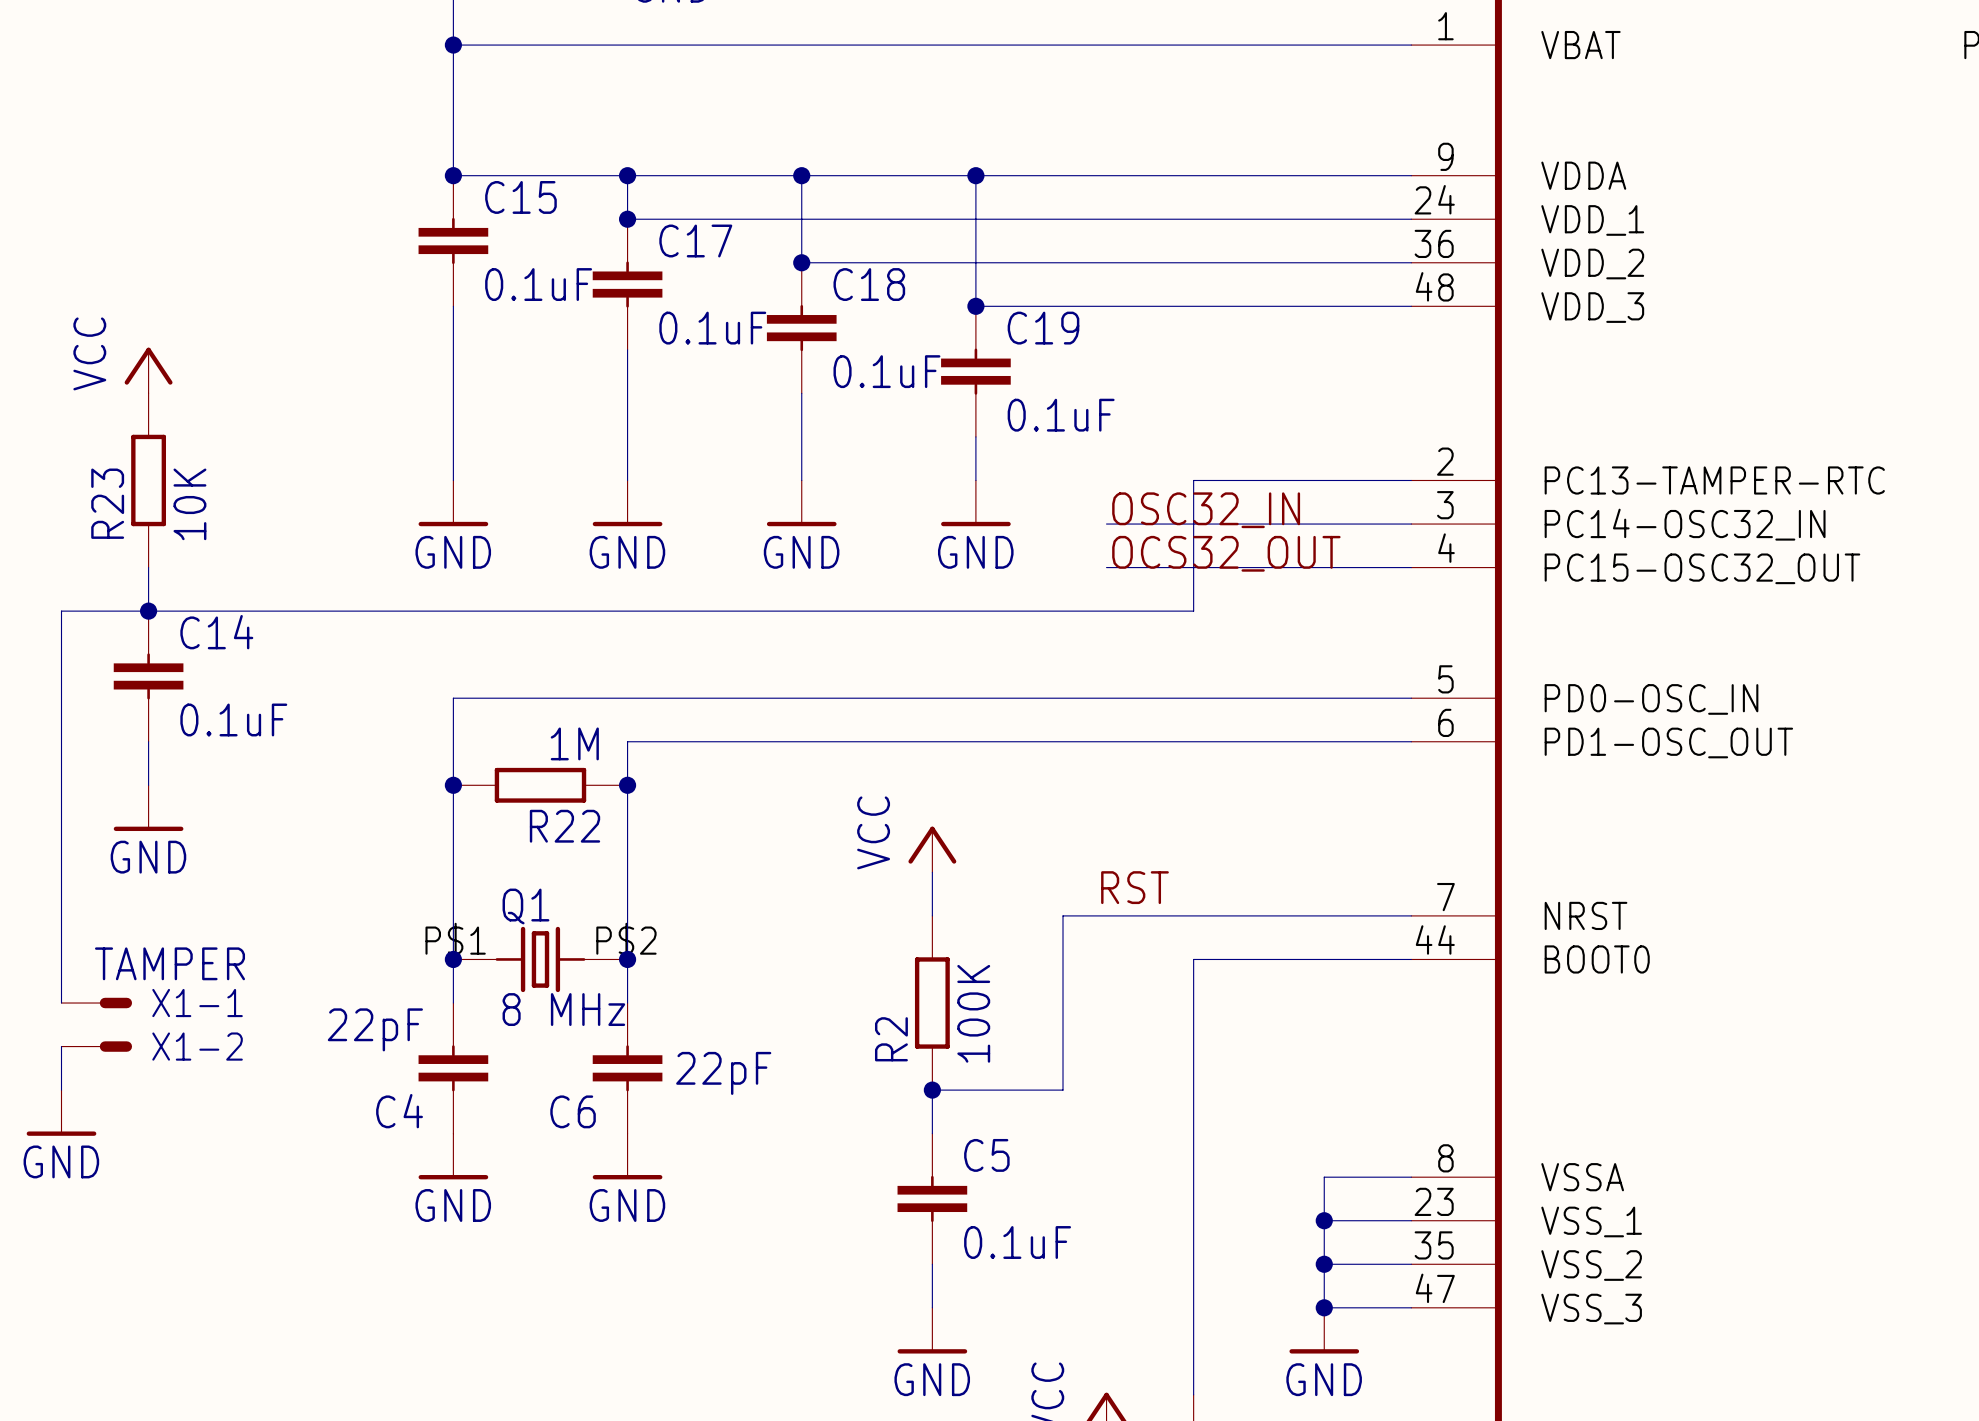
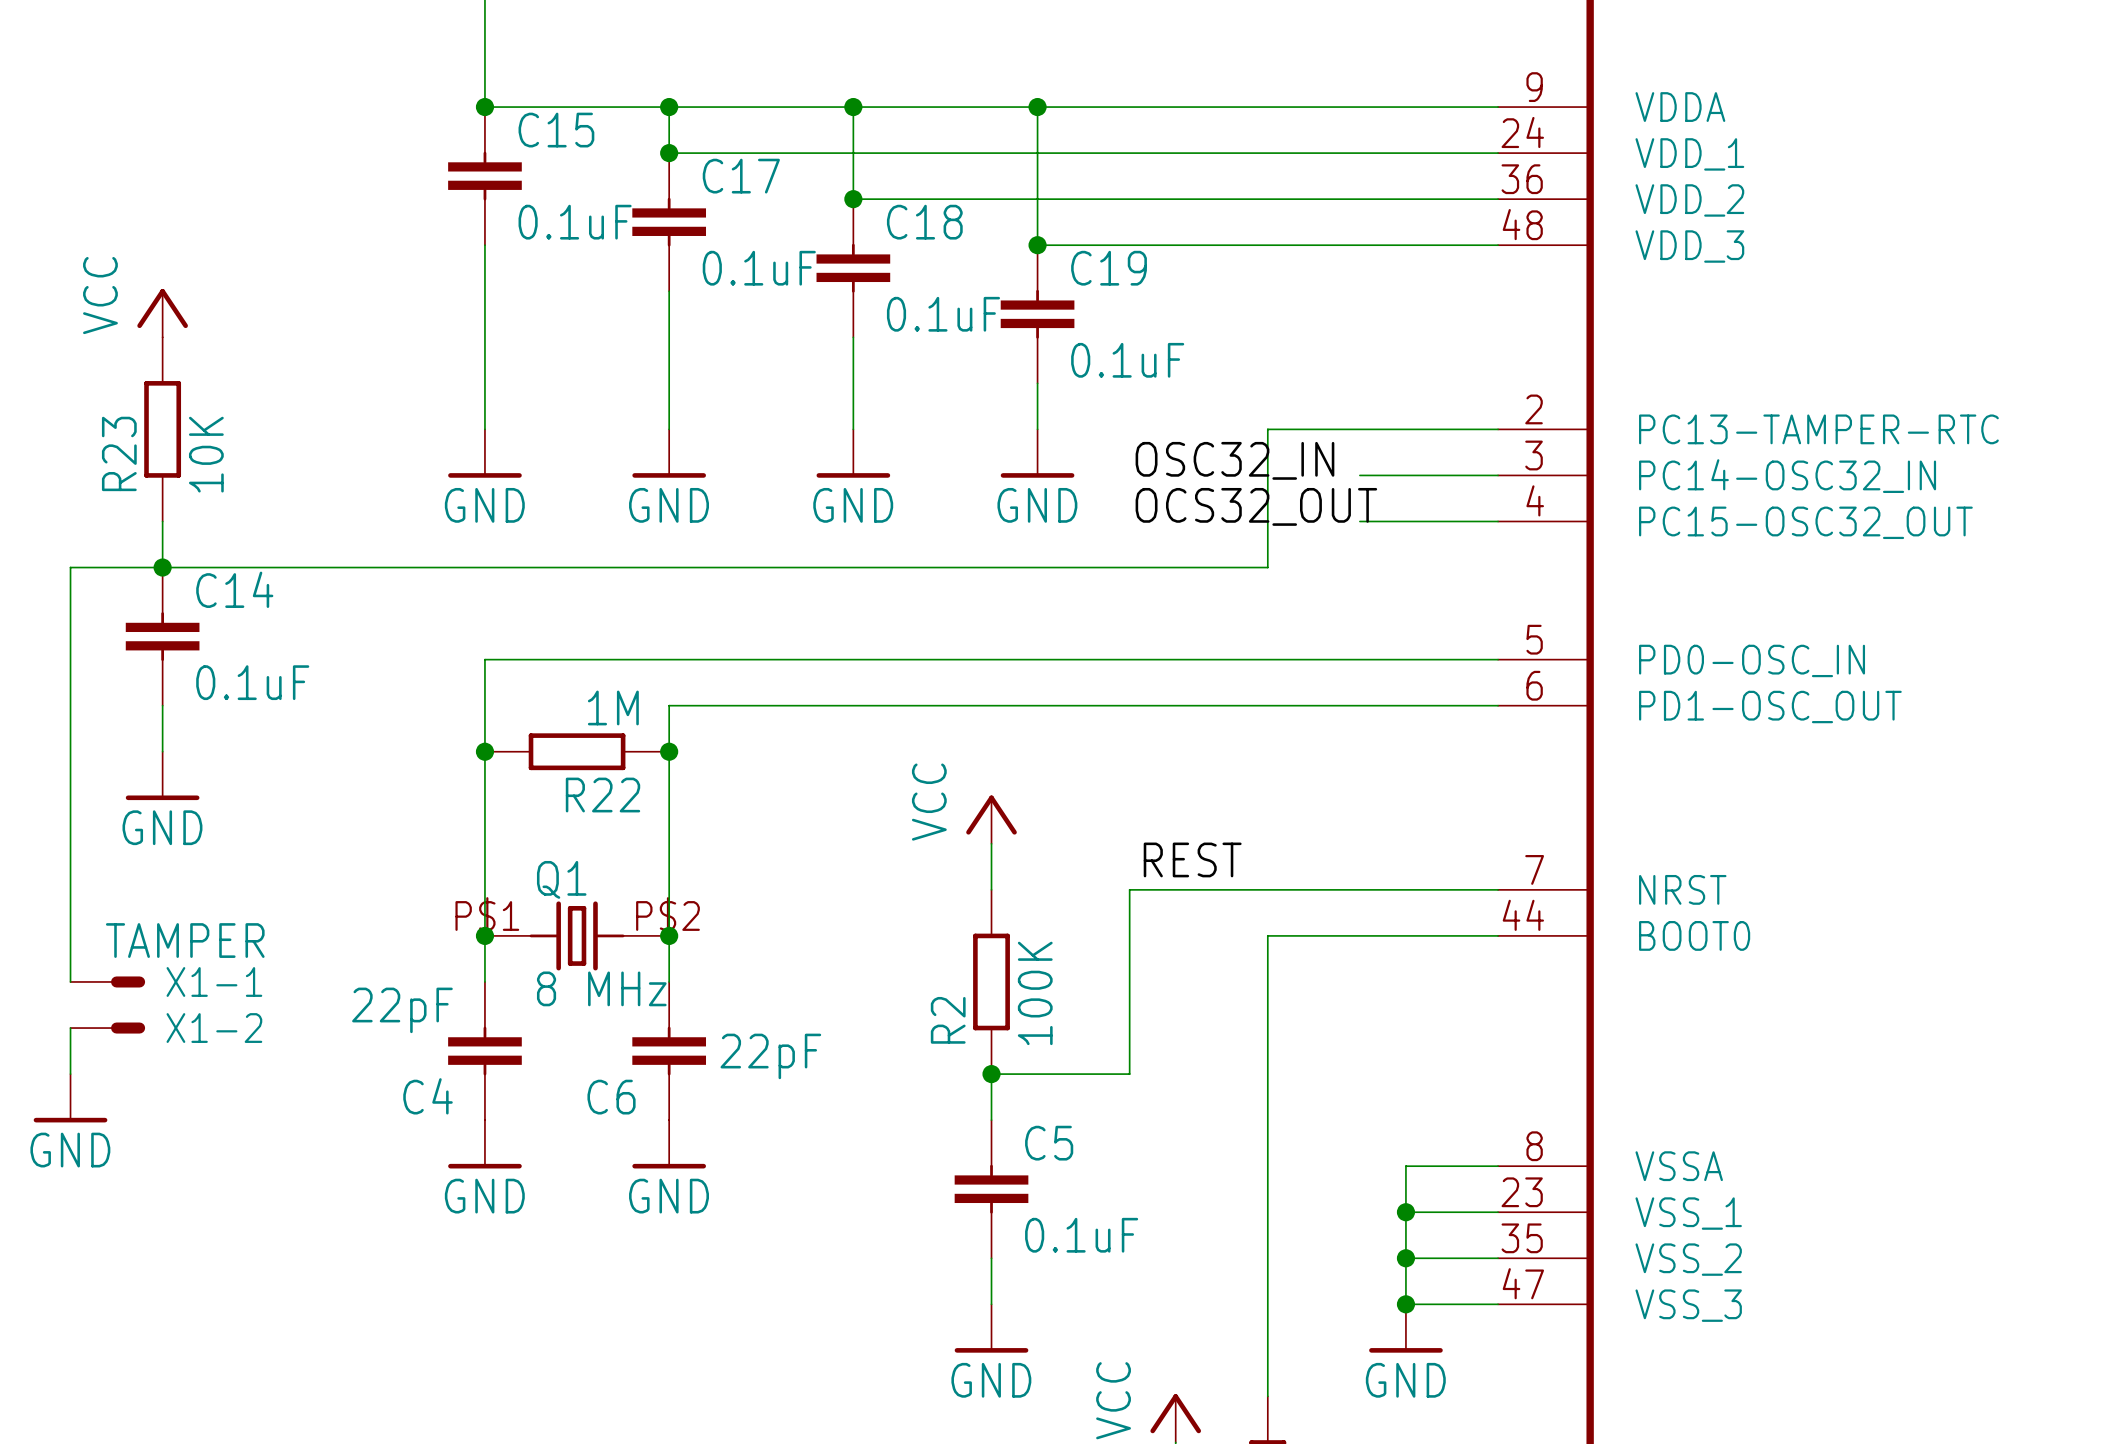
label position: OSC32_IN (1206, 510) -> OSC32_IN (1234, 460)
wire: (1106, 524) (1280, 524) -> none
label position: OCS32_OUT (1226, 553) -> OCS32_OUT (1256, 506)
wire: (1106, 567) (1280, 567) -> none
label: RST (1134, 887) -> REST (1192, 859)

